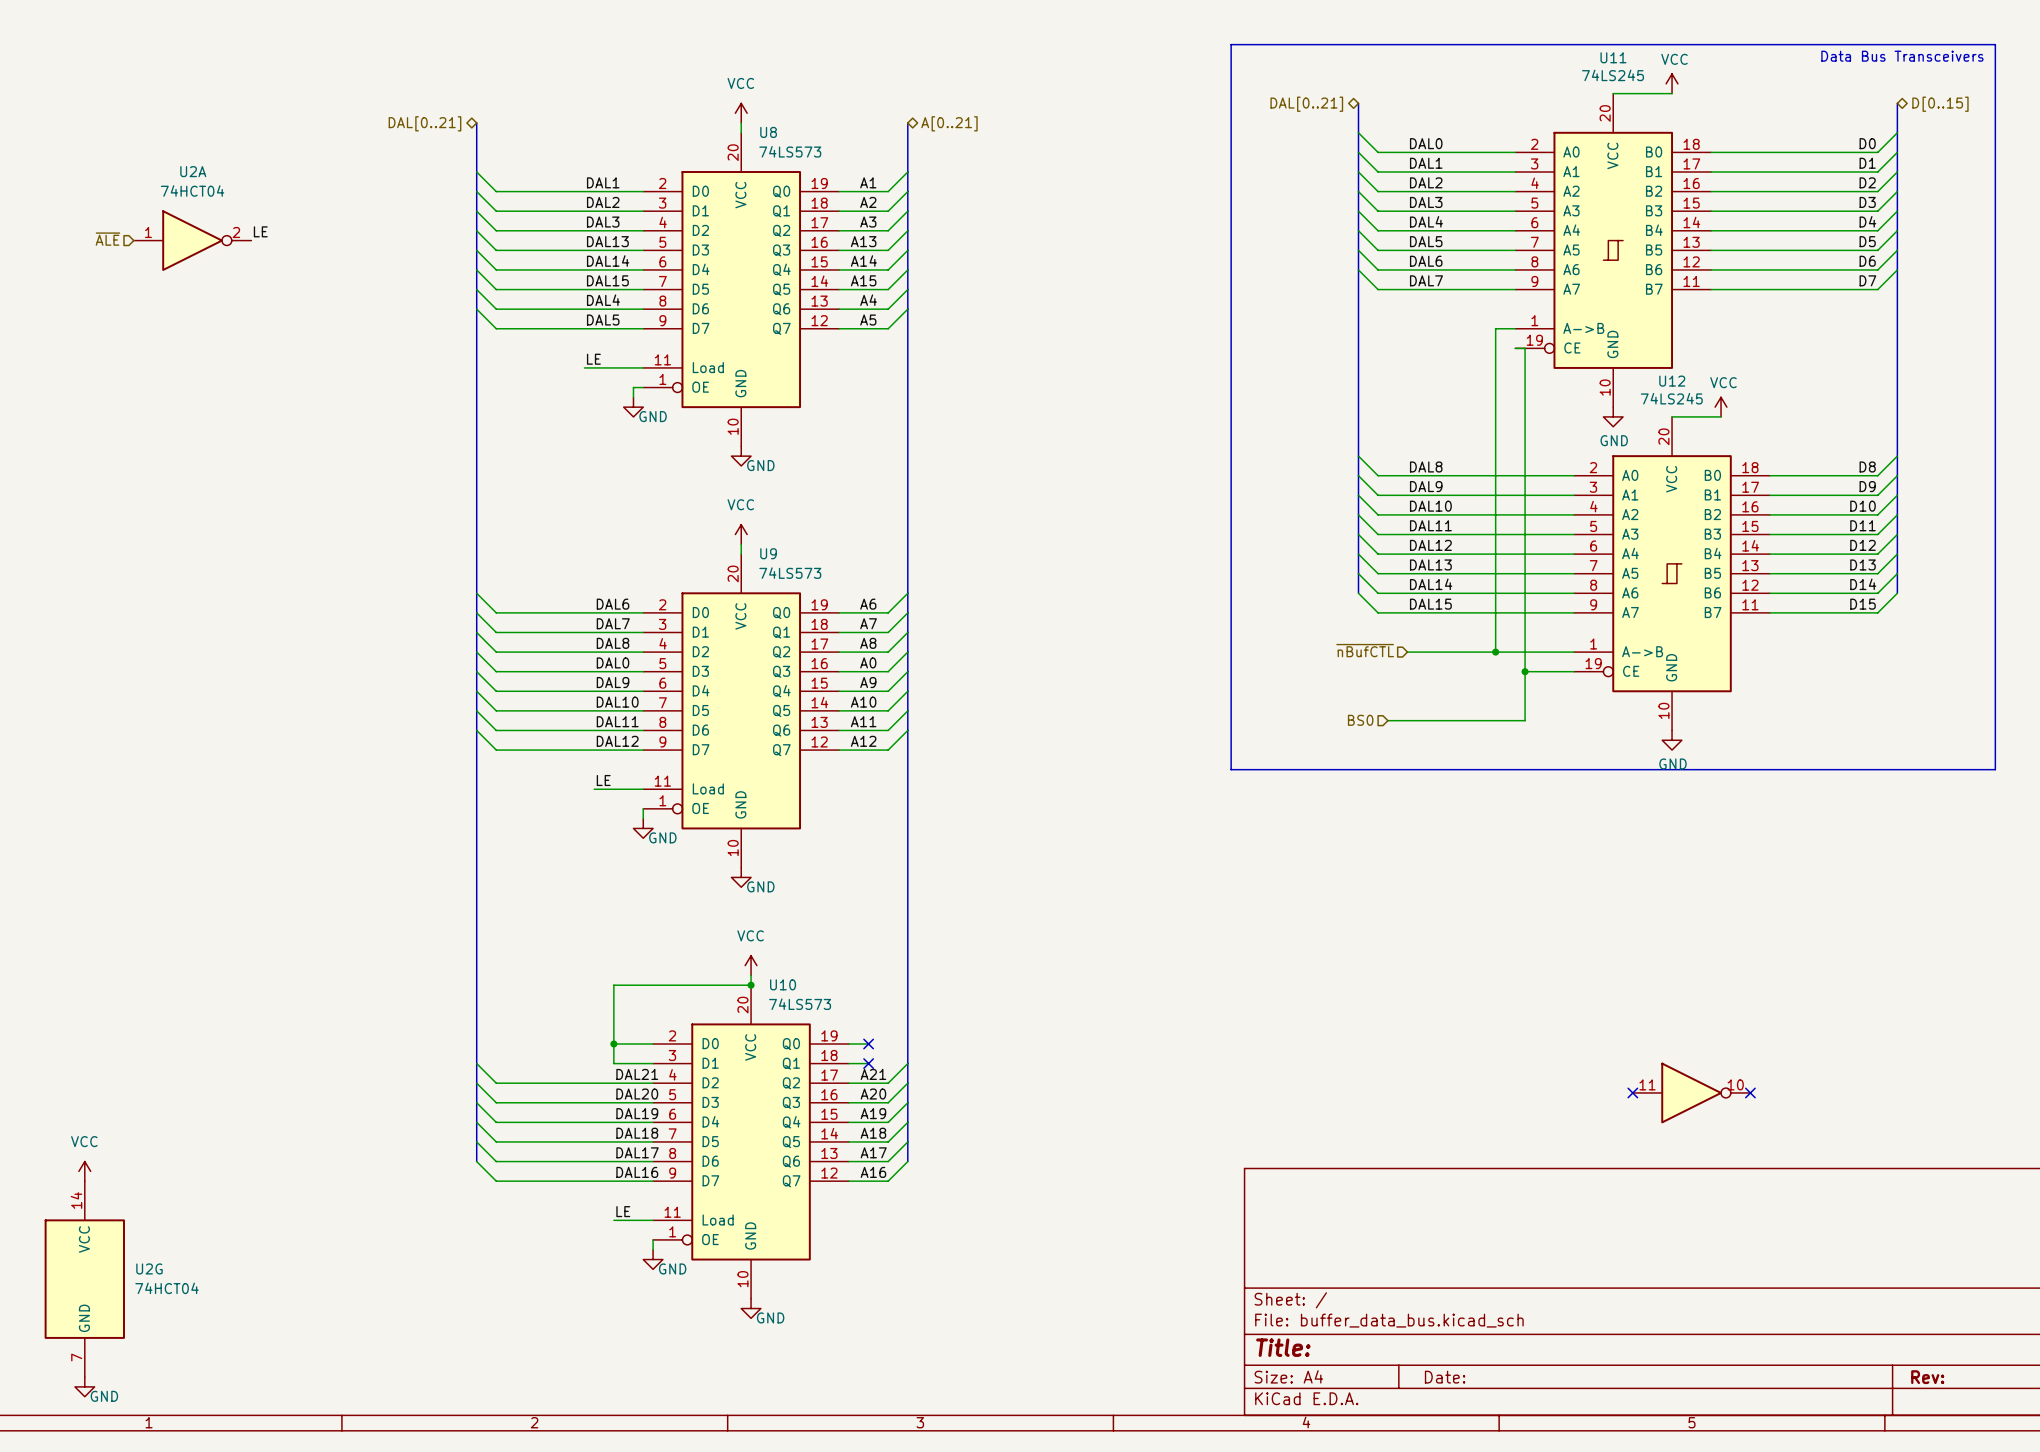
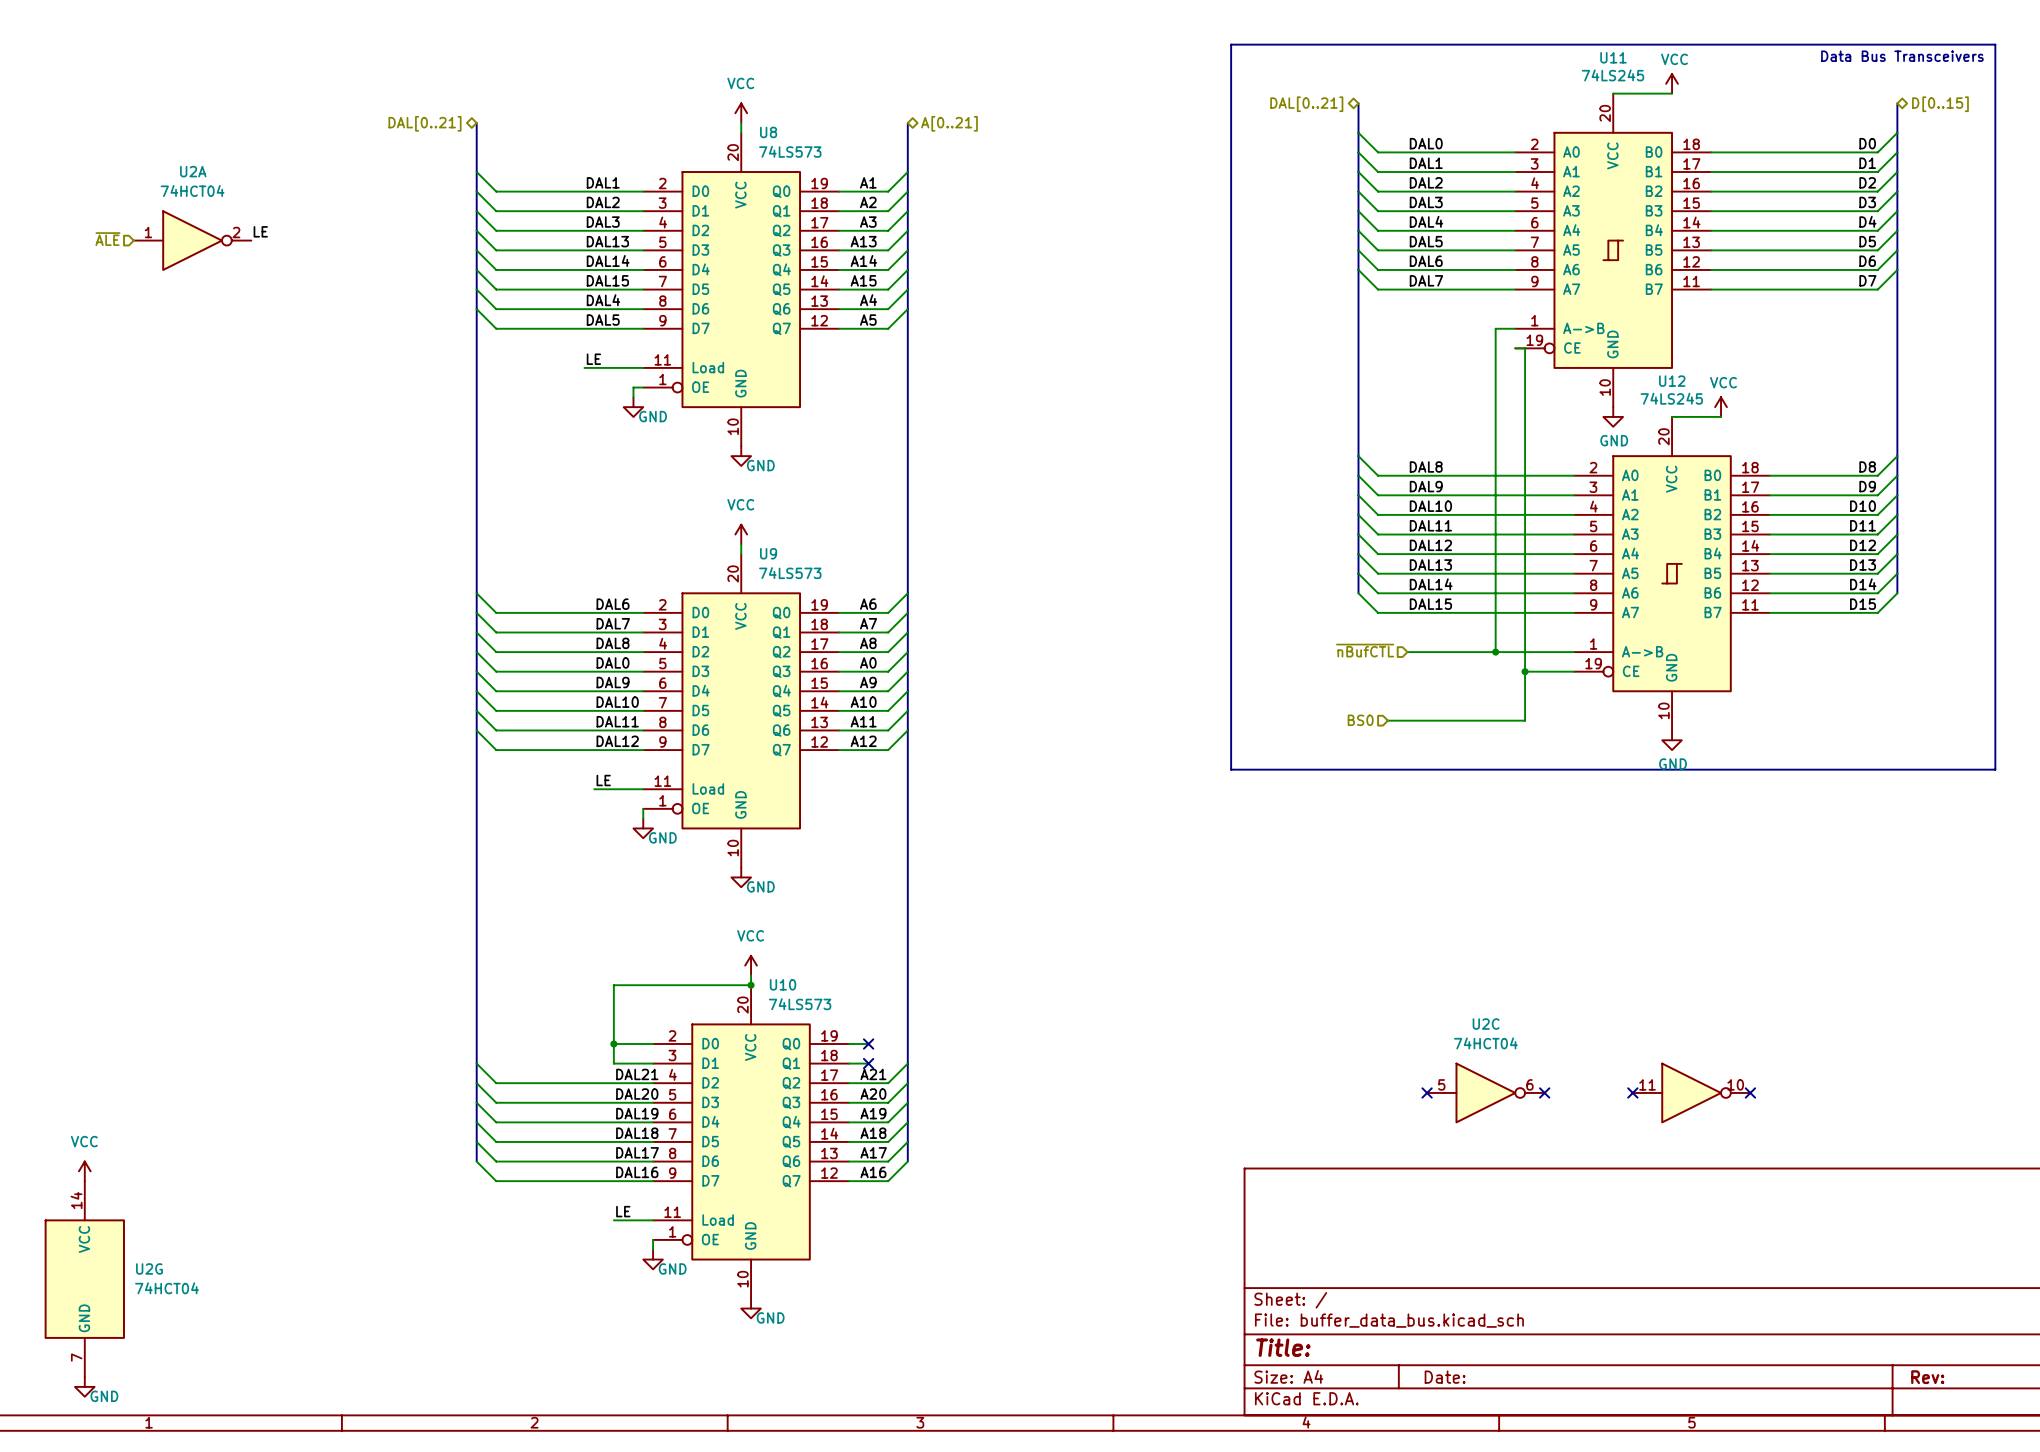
no-connect mark: none -> (1427, 1092)
U2C: none -> 74HCT04 (1485, 1092)
no-connect mark: none -> (1544, 1092)

